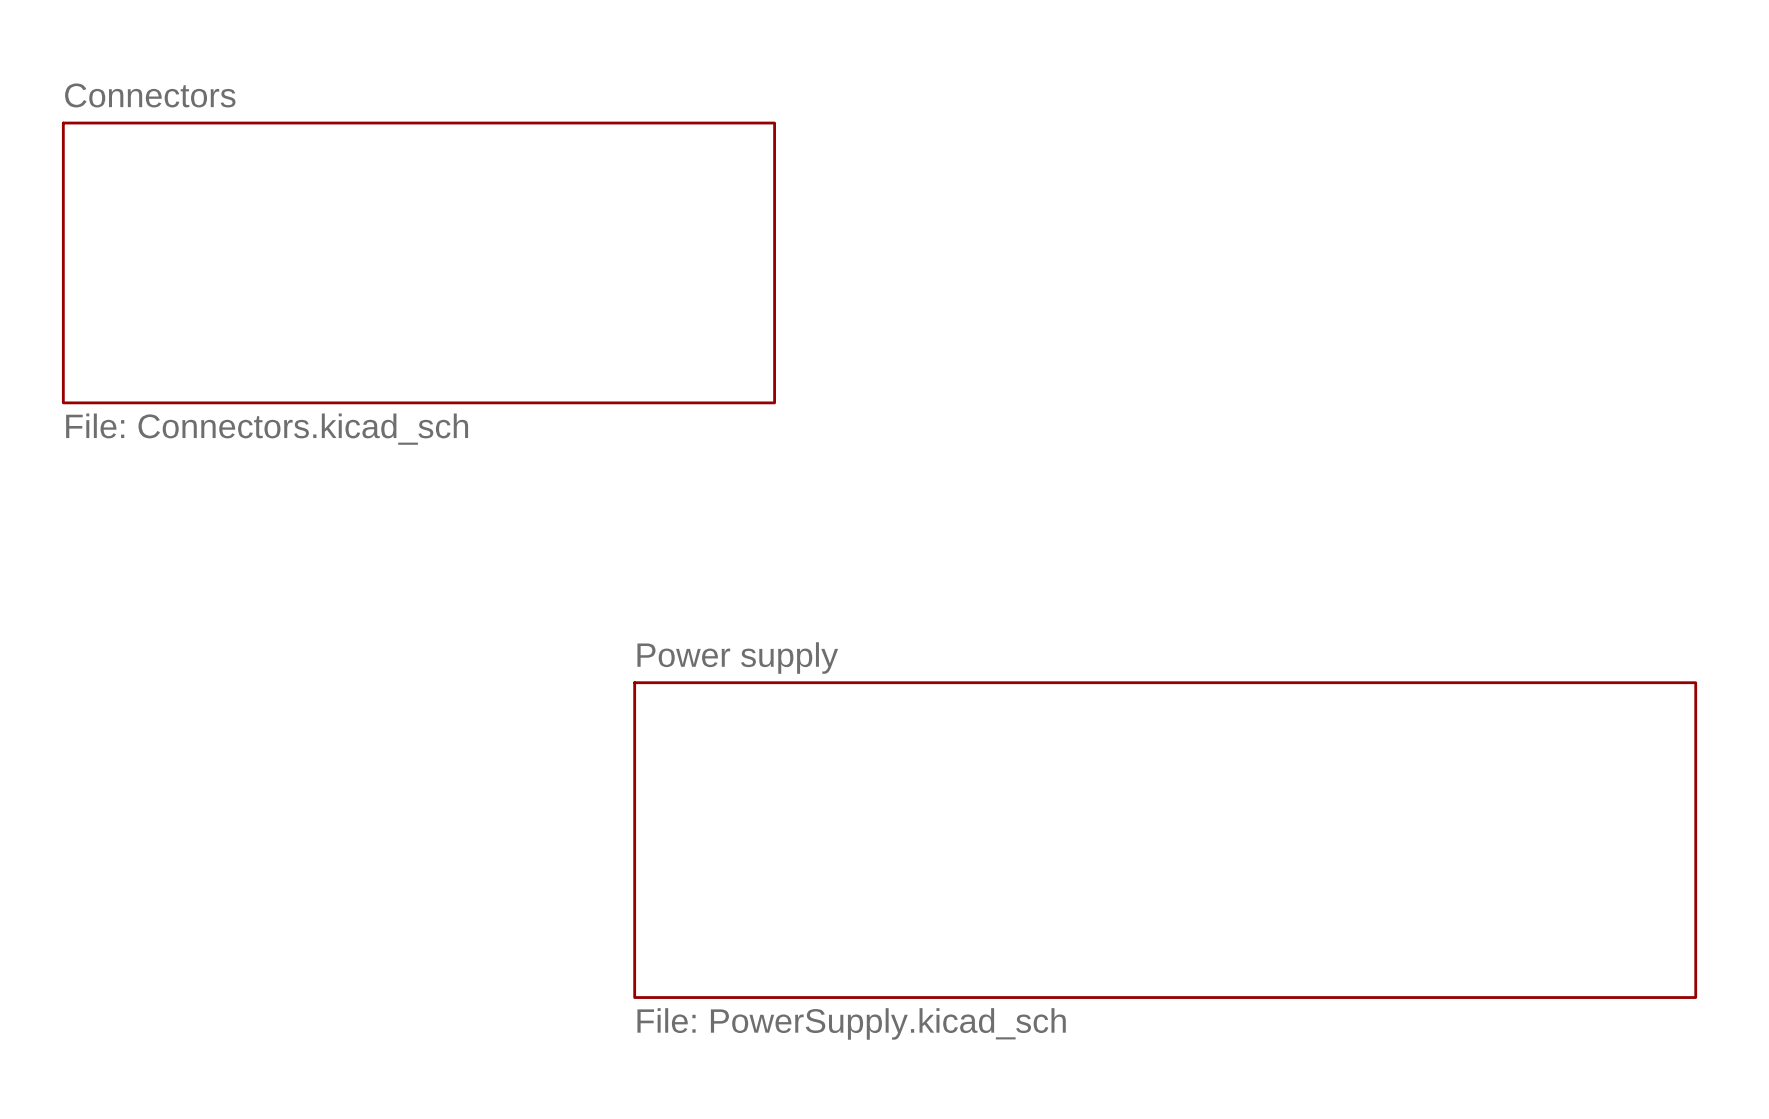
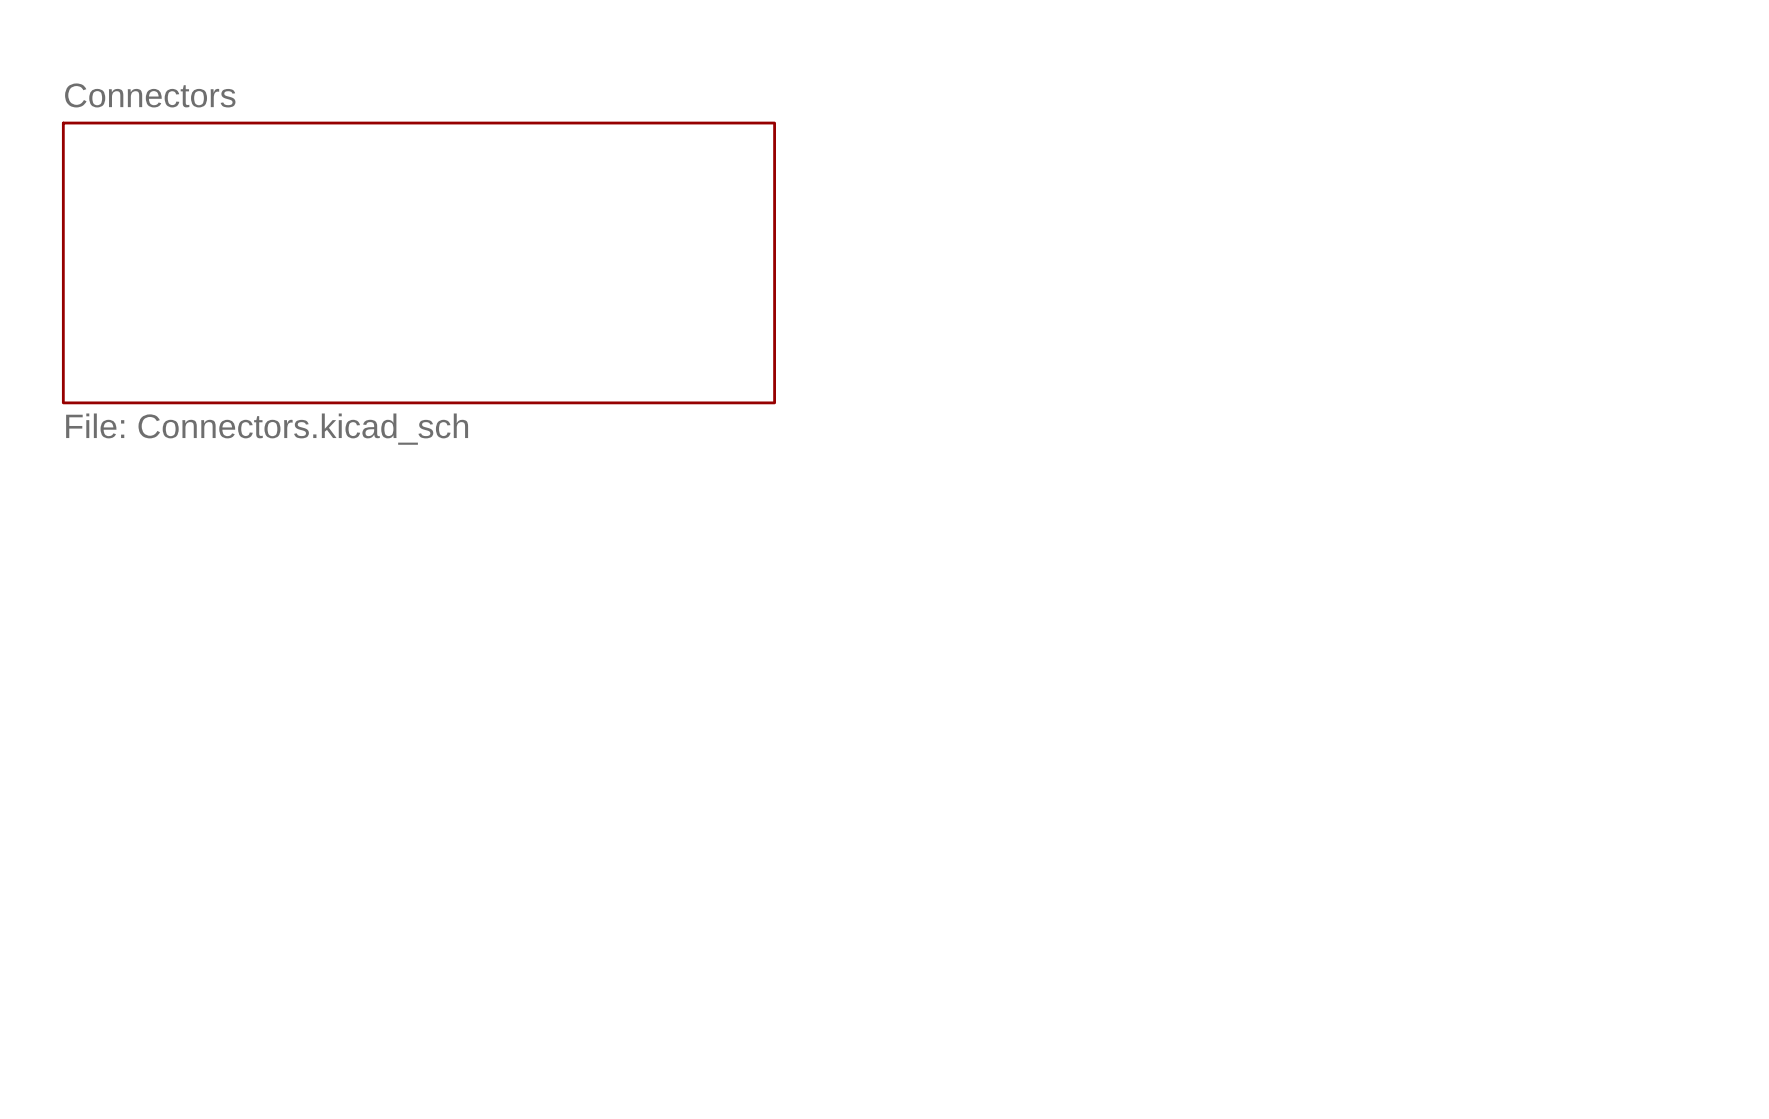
sheet Power supply: File: PowerSupply.kicad_sch (1165, 840) -> none

